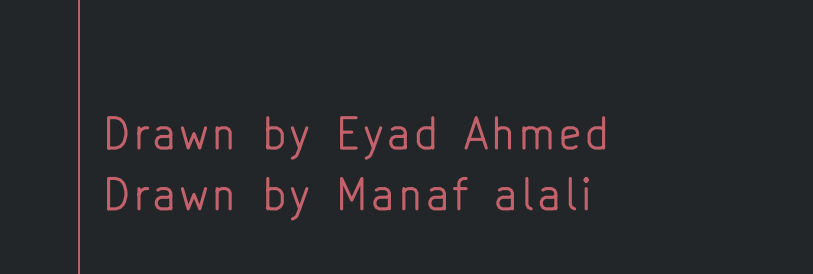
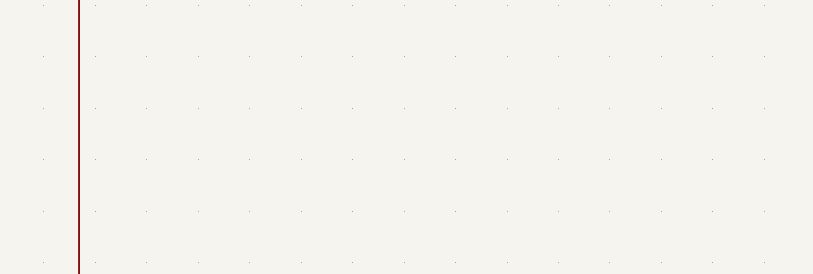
title block: Drawn by Eyad Ahmed (356, 137) -> none
title block: Drawn by Manaf alali (348, 198) -> none

